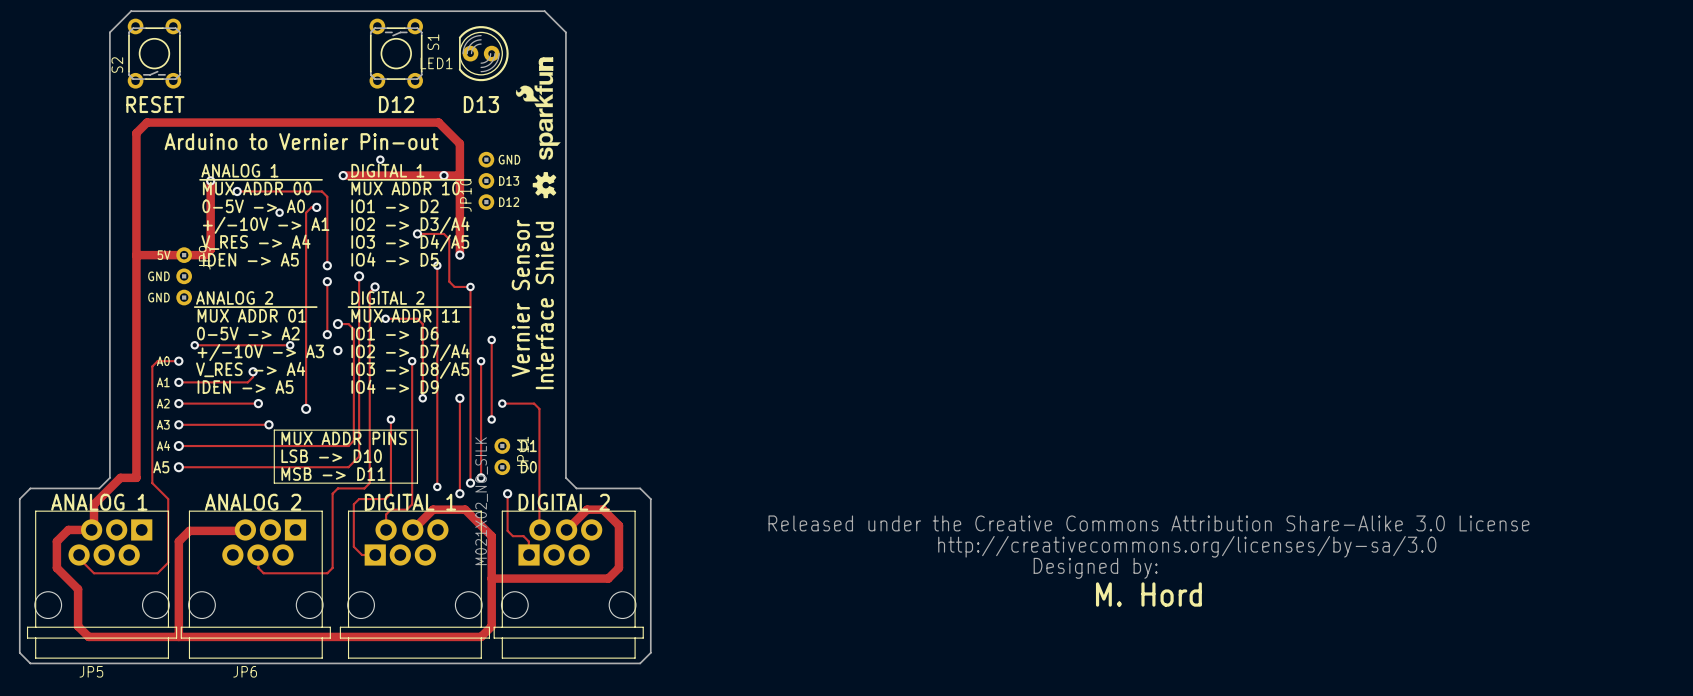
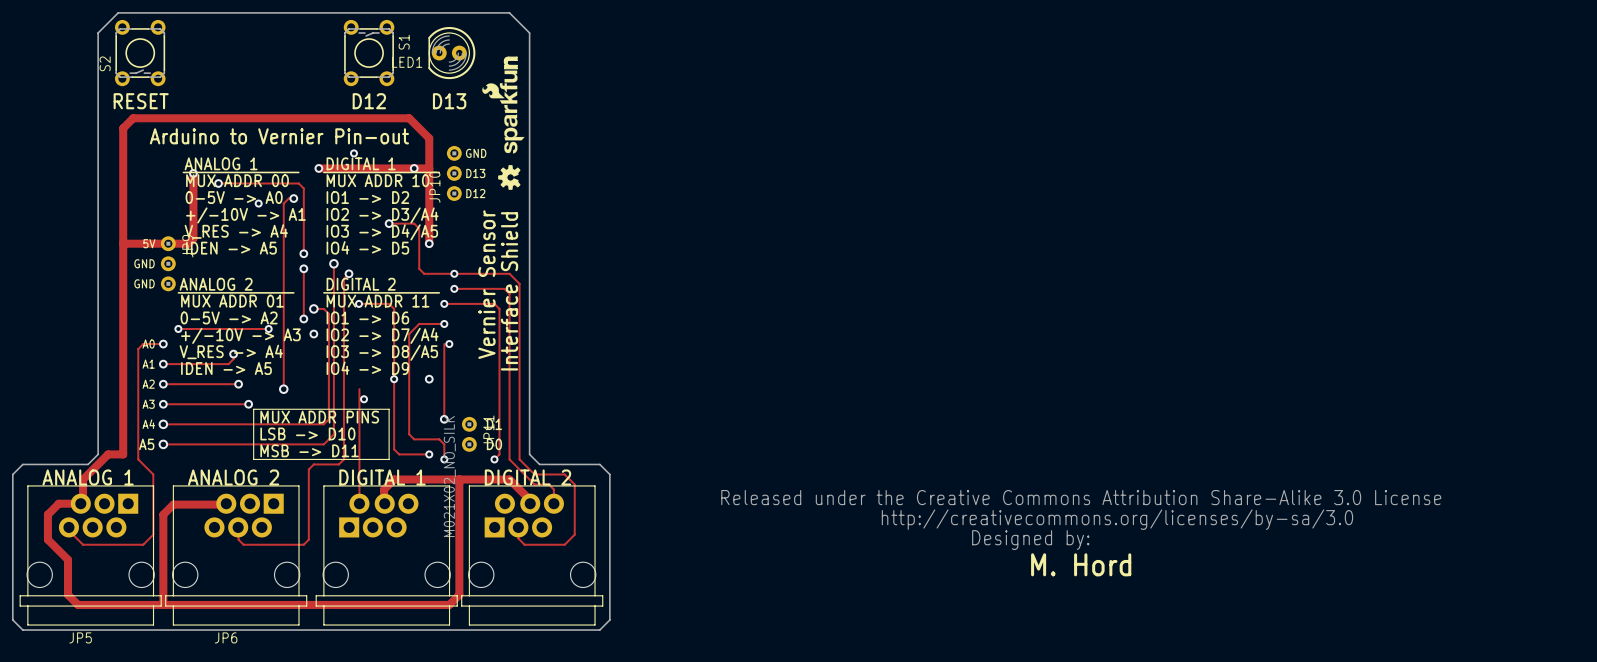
track: (437, 265) (437, 486) -> none
via: (437, 265) -> none
track: (470, 286) (470, 483) -> (439, 273) (509, 273) (519, 283) (519, 459) (534, 474) (564, 474) (574, 484) (574, 534) (564, 544) (524, 544) (518, 538) (518, 527)
via: (470, 286) -> none
via: none -> (454, 273)
track: none -> (454, 288) (504, 288) (509, 293) (509, 459) (534, 484) (548, 484) (553, 489) (553, 503)
via: none -> (454, 288)
track: none -> (444, 303) (494, 303) (499, 308) (499, 454) (494, 459)
via: none -> (444, 303)
track: none -> (444, 323) (419, 323) (409, 334) (409, 434) (414, 439) (439, 439) (444, 444) (444, 459)
via: none -> (444, 323)
track: (491, 339) (491, 419) -> (444, 344) (444, 419)
via: (491, 339) -> none
track: (412, 361) (412, 504) (406, 509) (390, 509) (386, 514) -> (359, 389) (359, 489)
via: (412, 361) -> none
track: (481, 361) (481, 477) -> none
track: none -> (394, 379) (394, 449) (399, 454) (429, 454)
track: (459, 398) (459, 493) -> none
track: (502, 403) (534, 403) (539, 408) (539, 529) -> none
via: (502, 403) -> none
track: (390, 419) (390, 493) (385, 499) (359, 499) (353, 504) (353, 546) (362, 555) (375, 555) -> none
via: (491, 419) -> none
via: none -> (444, 419)
via: none -> (429, 454)
via: (481, 477) -> none
via: (470, 483) -> none
via: none -> (444, 459)
via: none -> (494, 459)
via: (437, 486) -> none
via: (459, 493) -> none
track: (507, 493) (507, 530) (512, 536) (523, 536) (528, 541) (529, 555) -> none
via: (507, 493) -> none
track: none -> (459, 479) (459, 509)
track: (412, 529) (433, 509) (465, 509) (491, 536) -> (384, 503) (384, 489) (394, 479) (509, 479) (530, 500) (530, 503)
track: (566, 529) (587, 509) (603, 509) (618, 525) (618, 567) (608, 578) (491, 578) -> none

